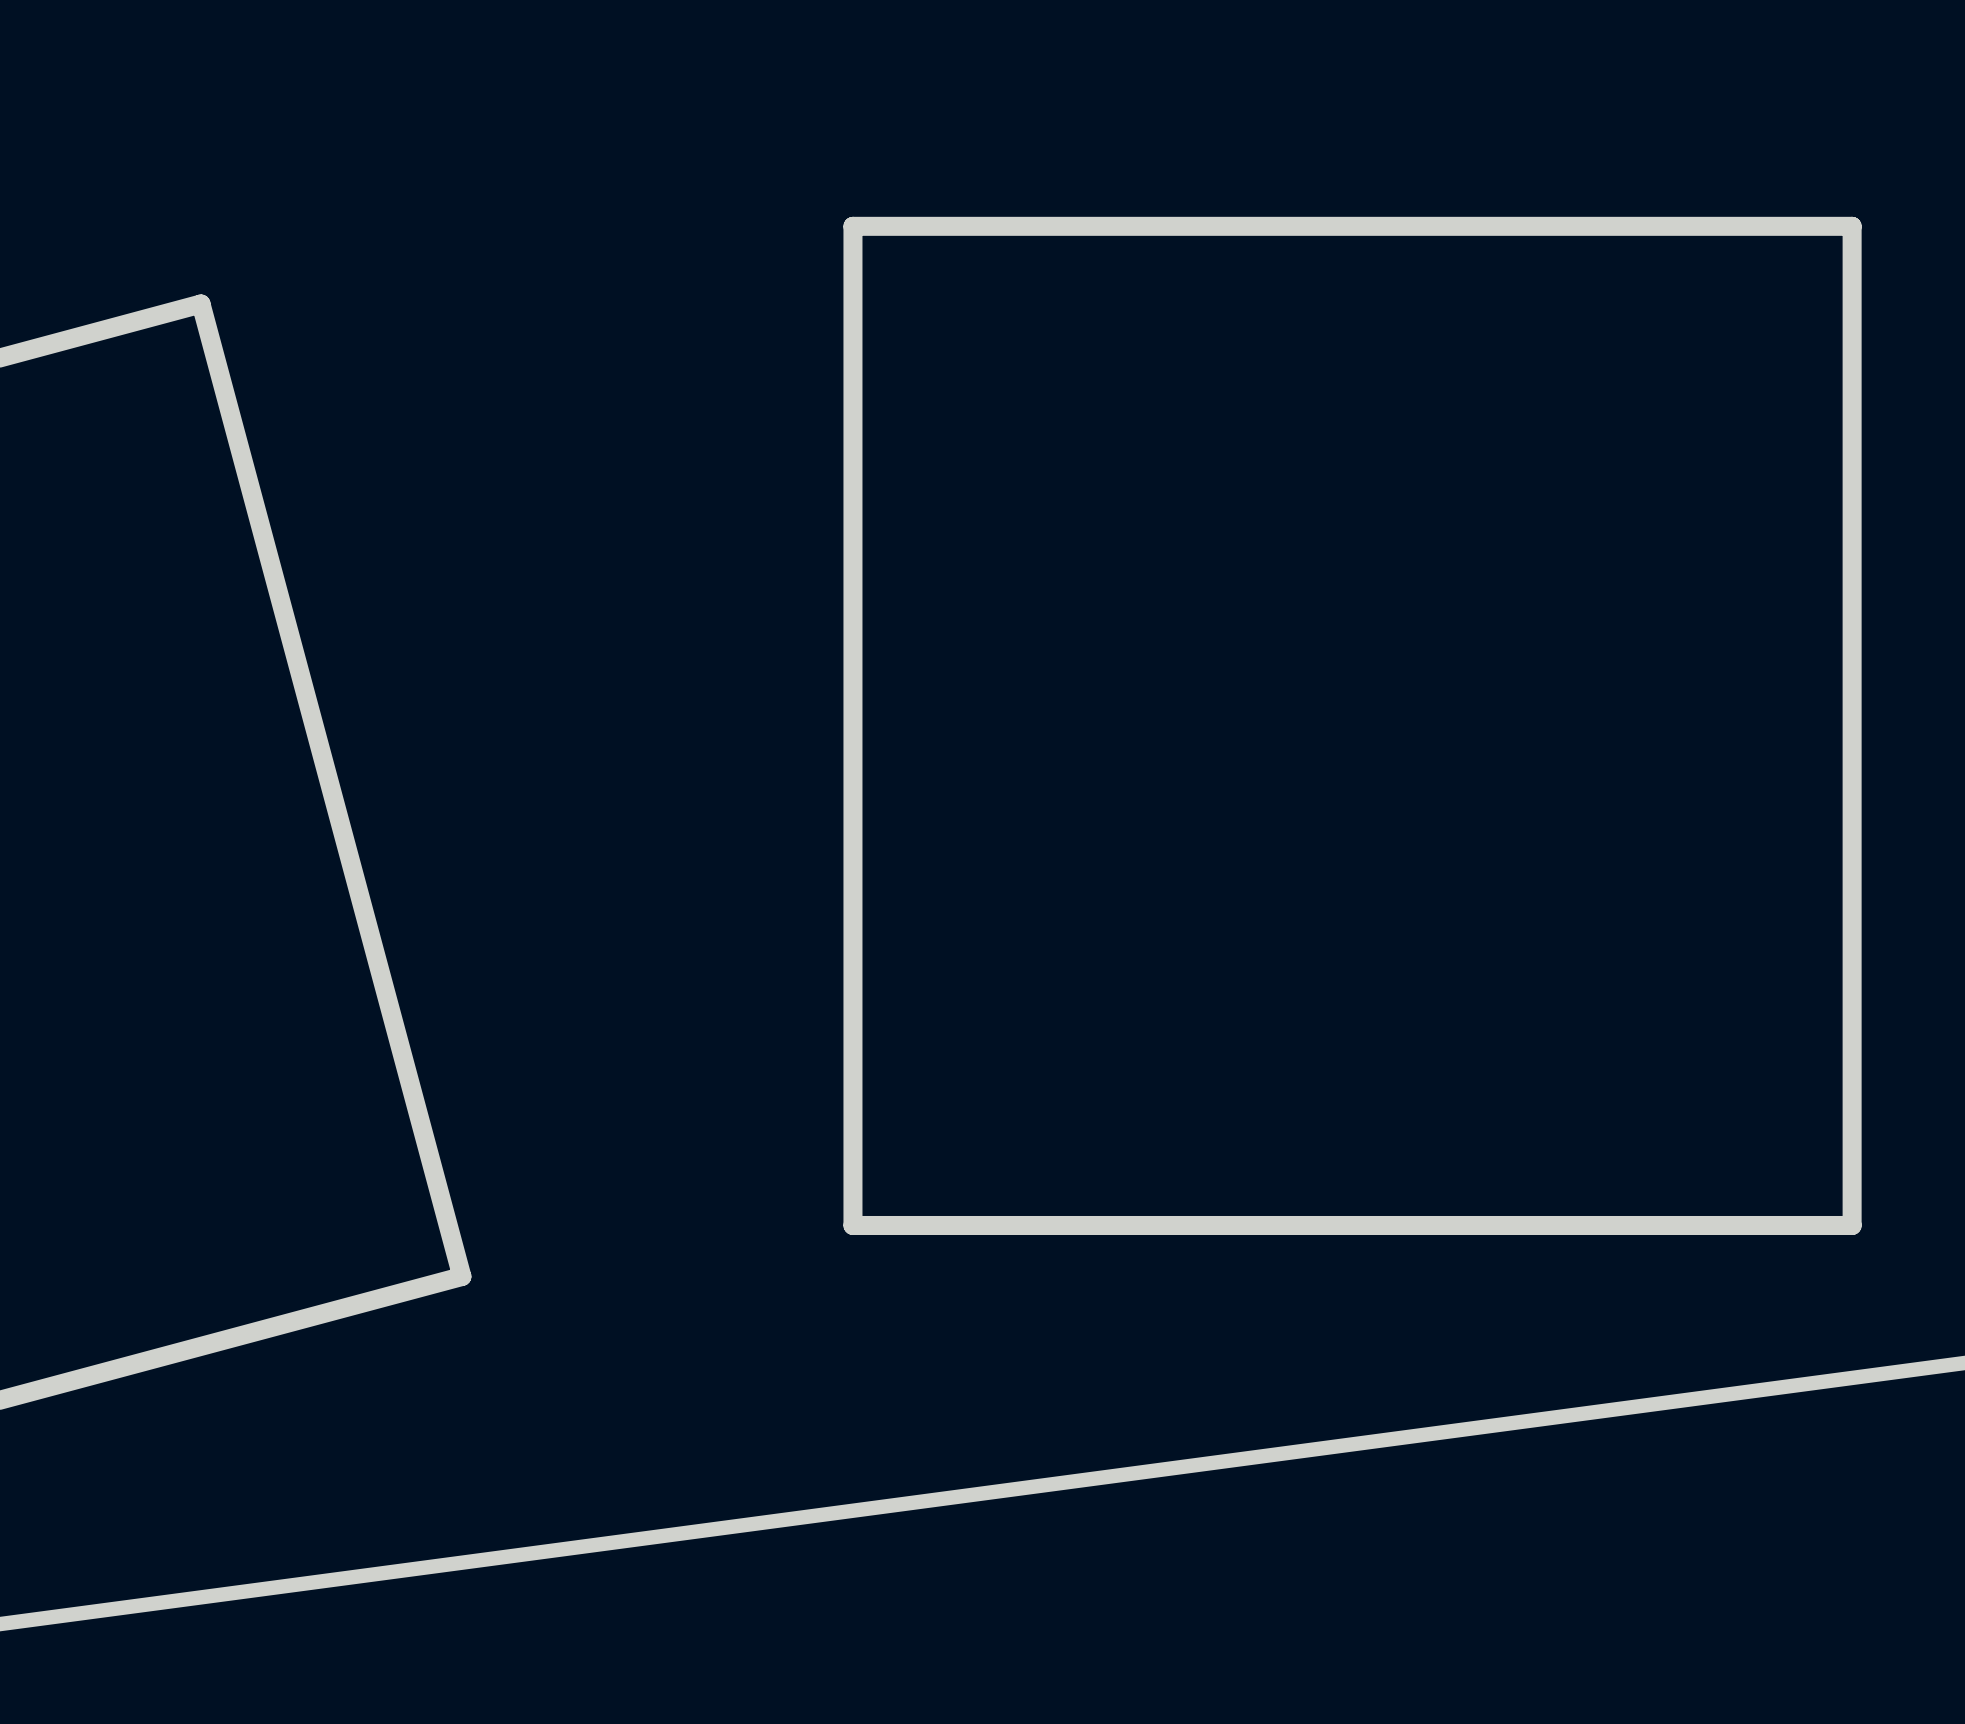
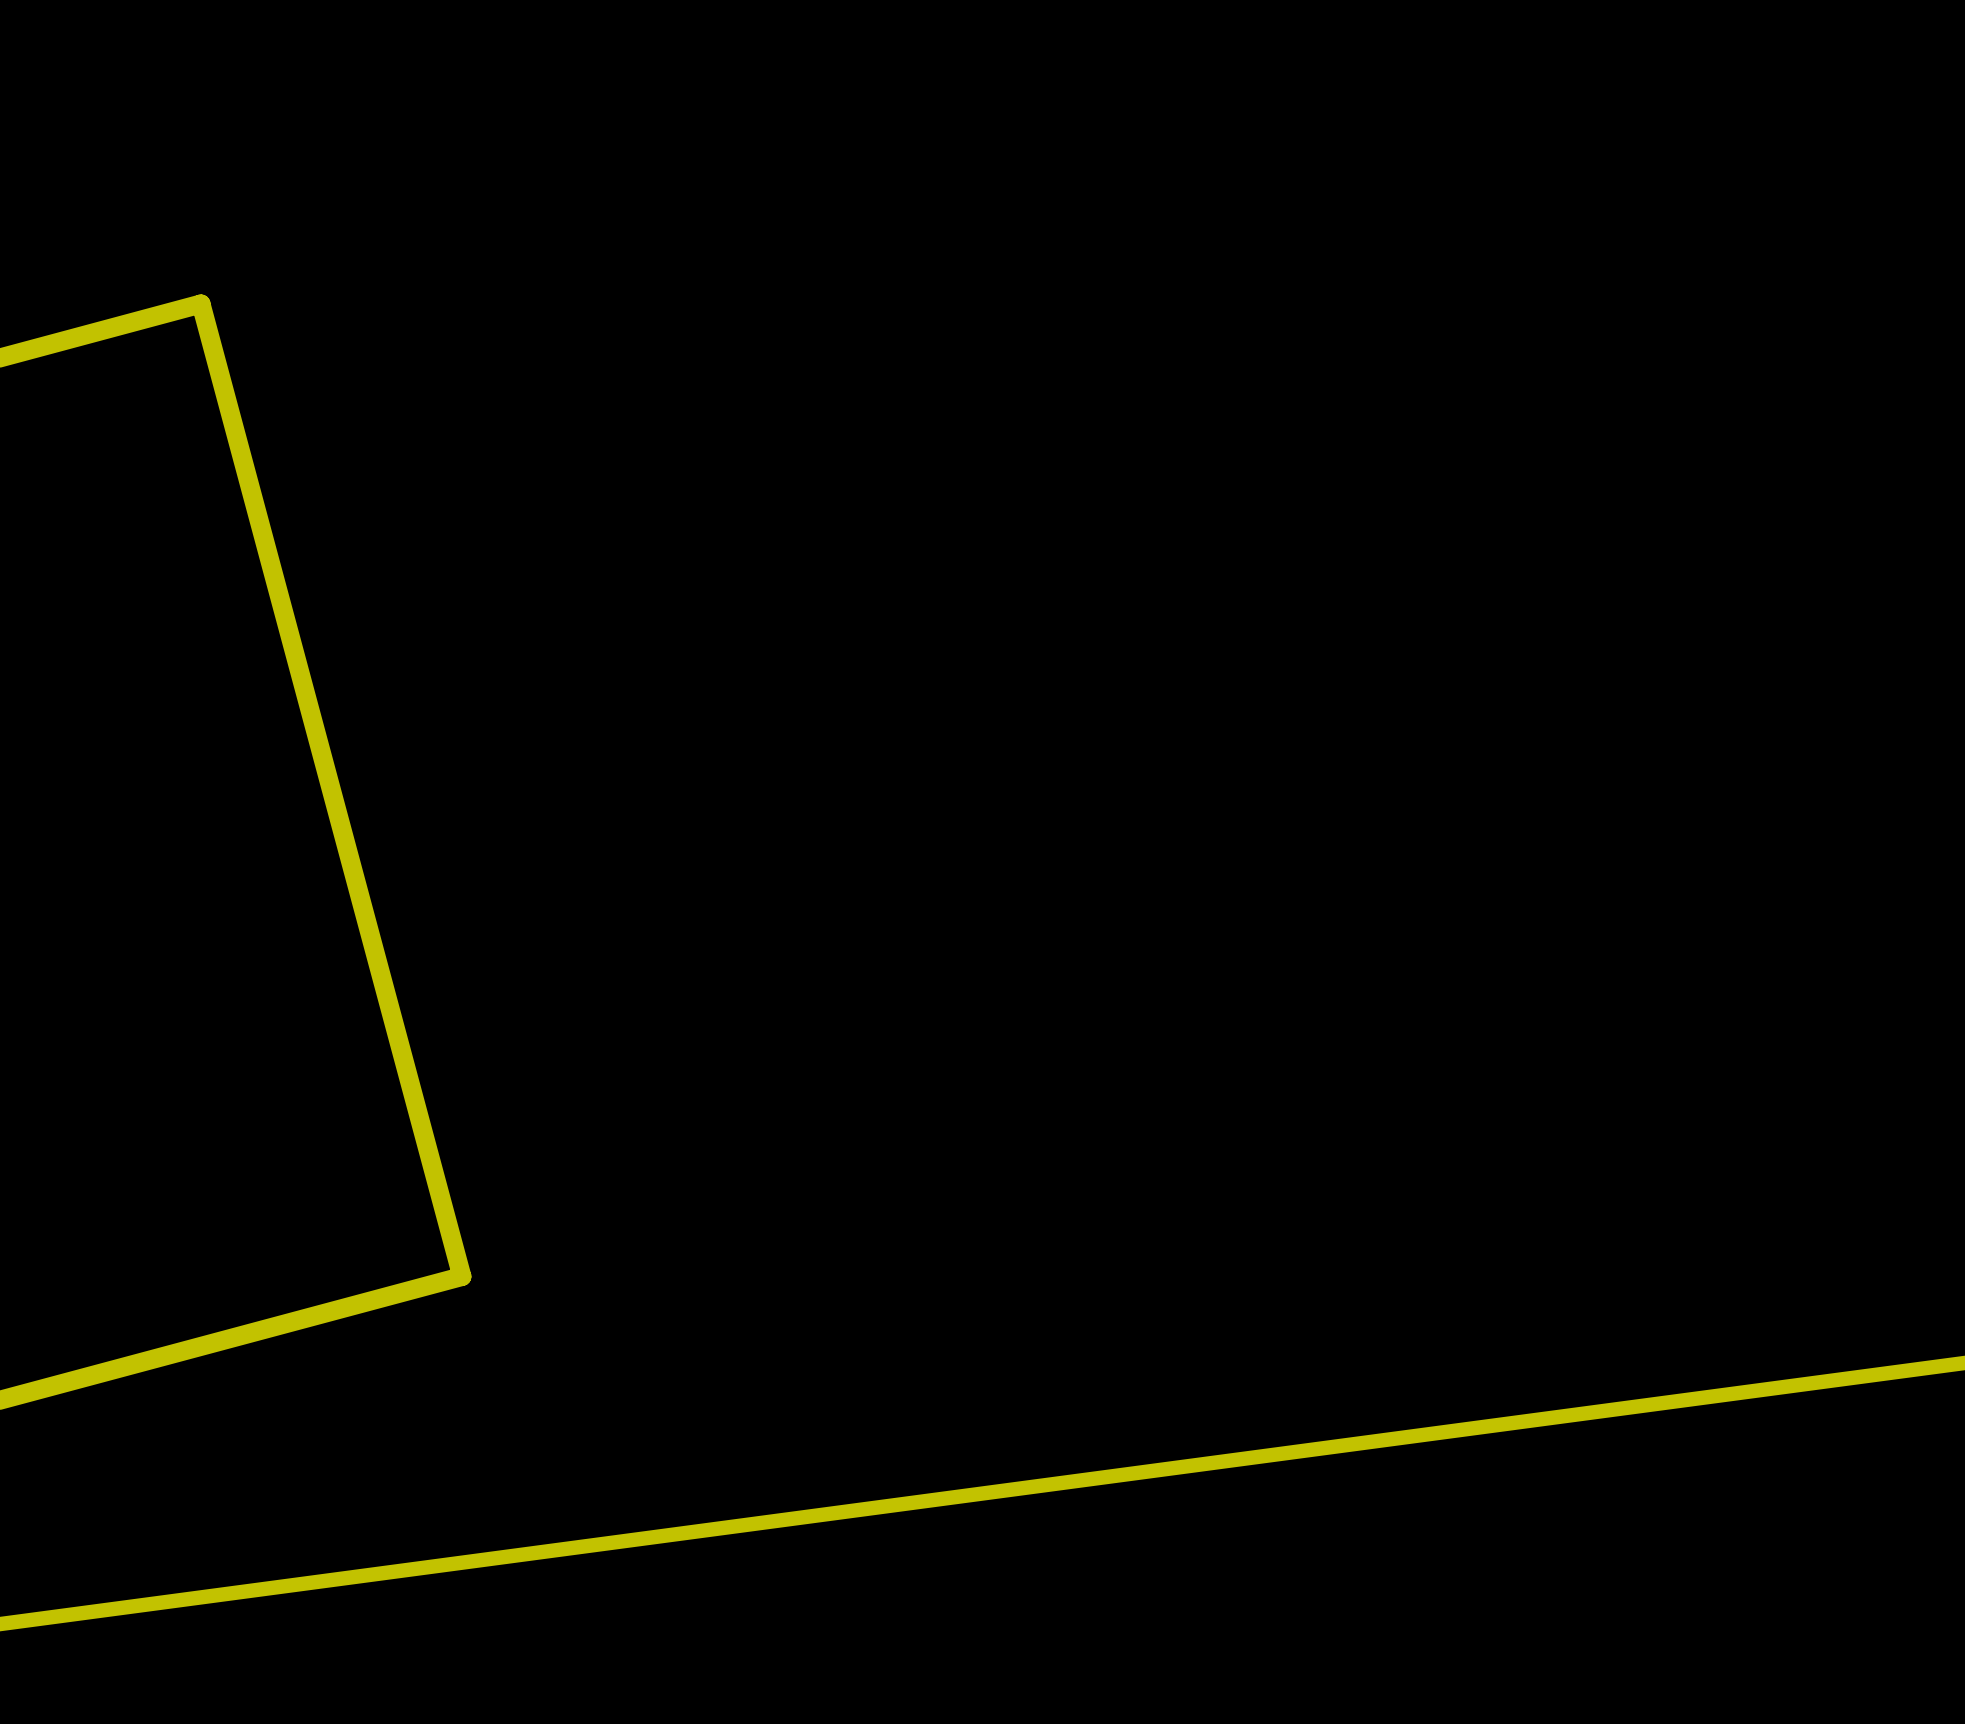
board edge: (1852, 226) (1852, 1225) (852, 1225) (852, 226) (1852, 226) -> none

